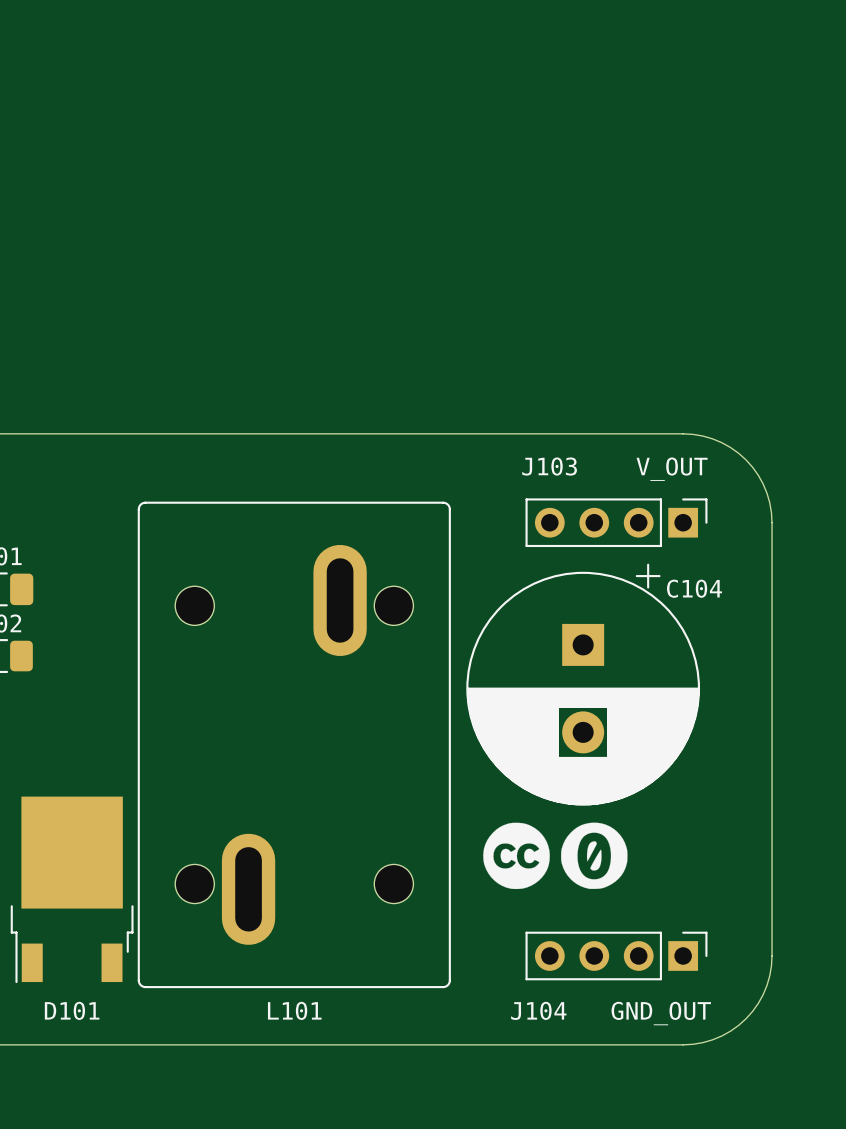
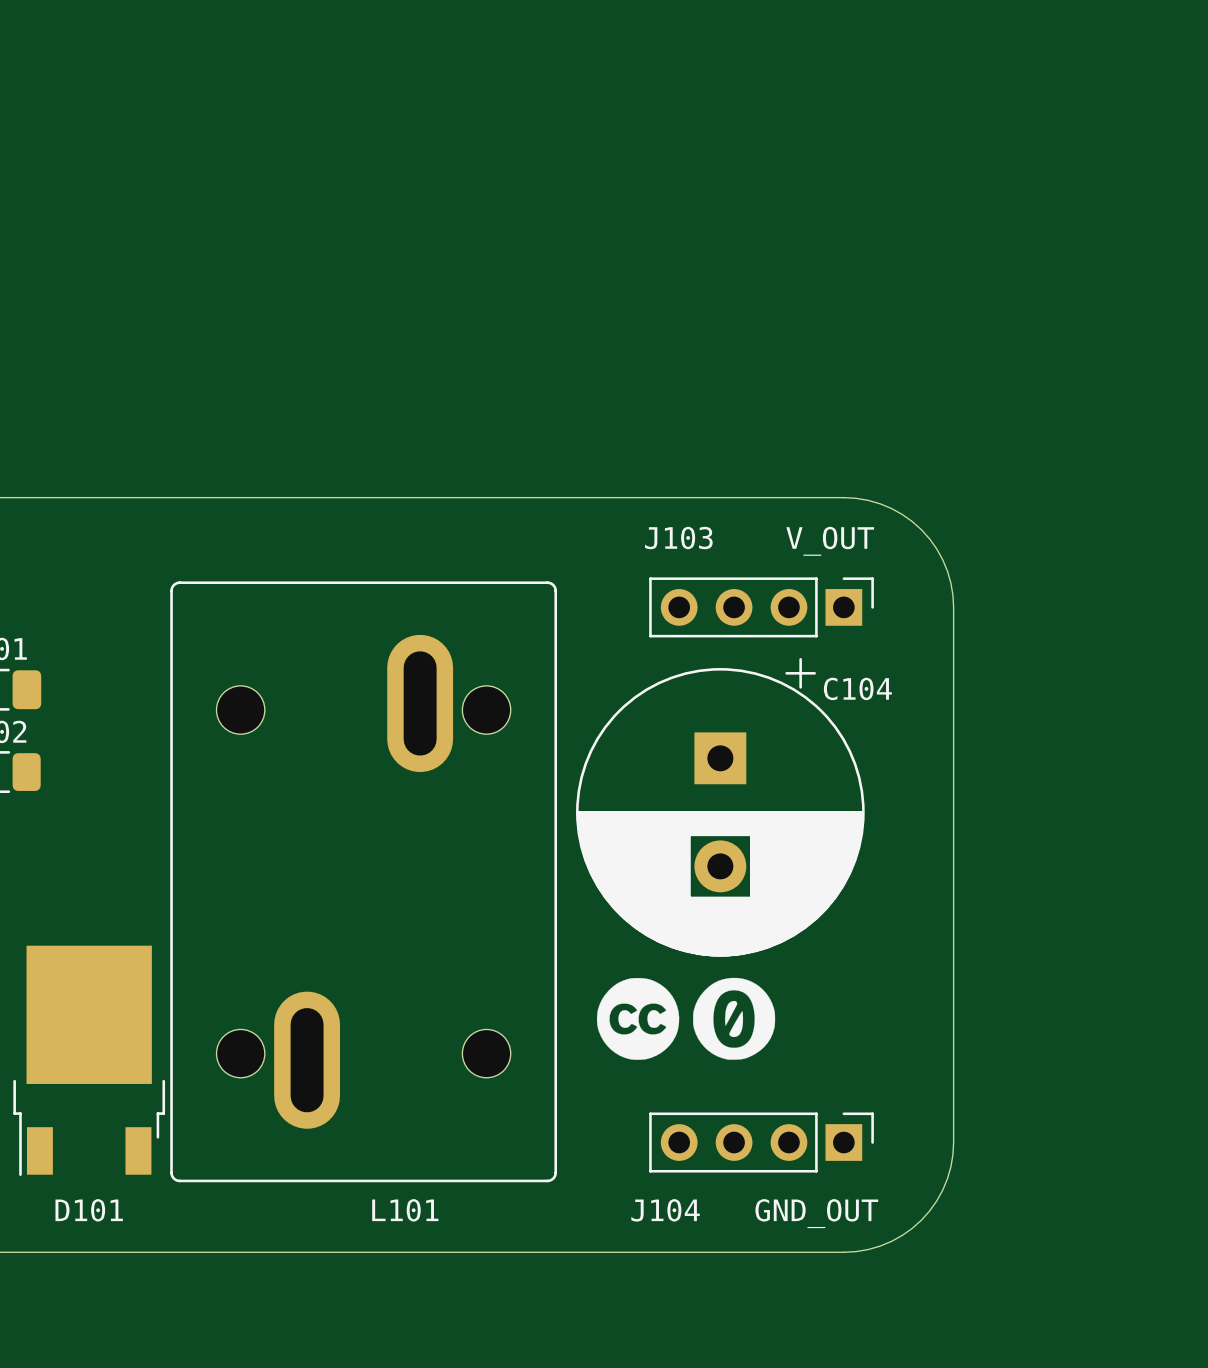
L101 name position: L101 (294, 1010) -> L101 (405, 1210)

